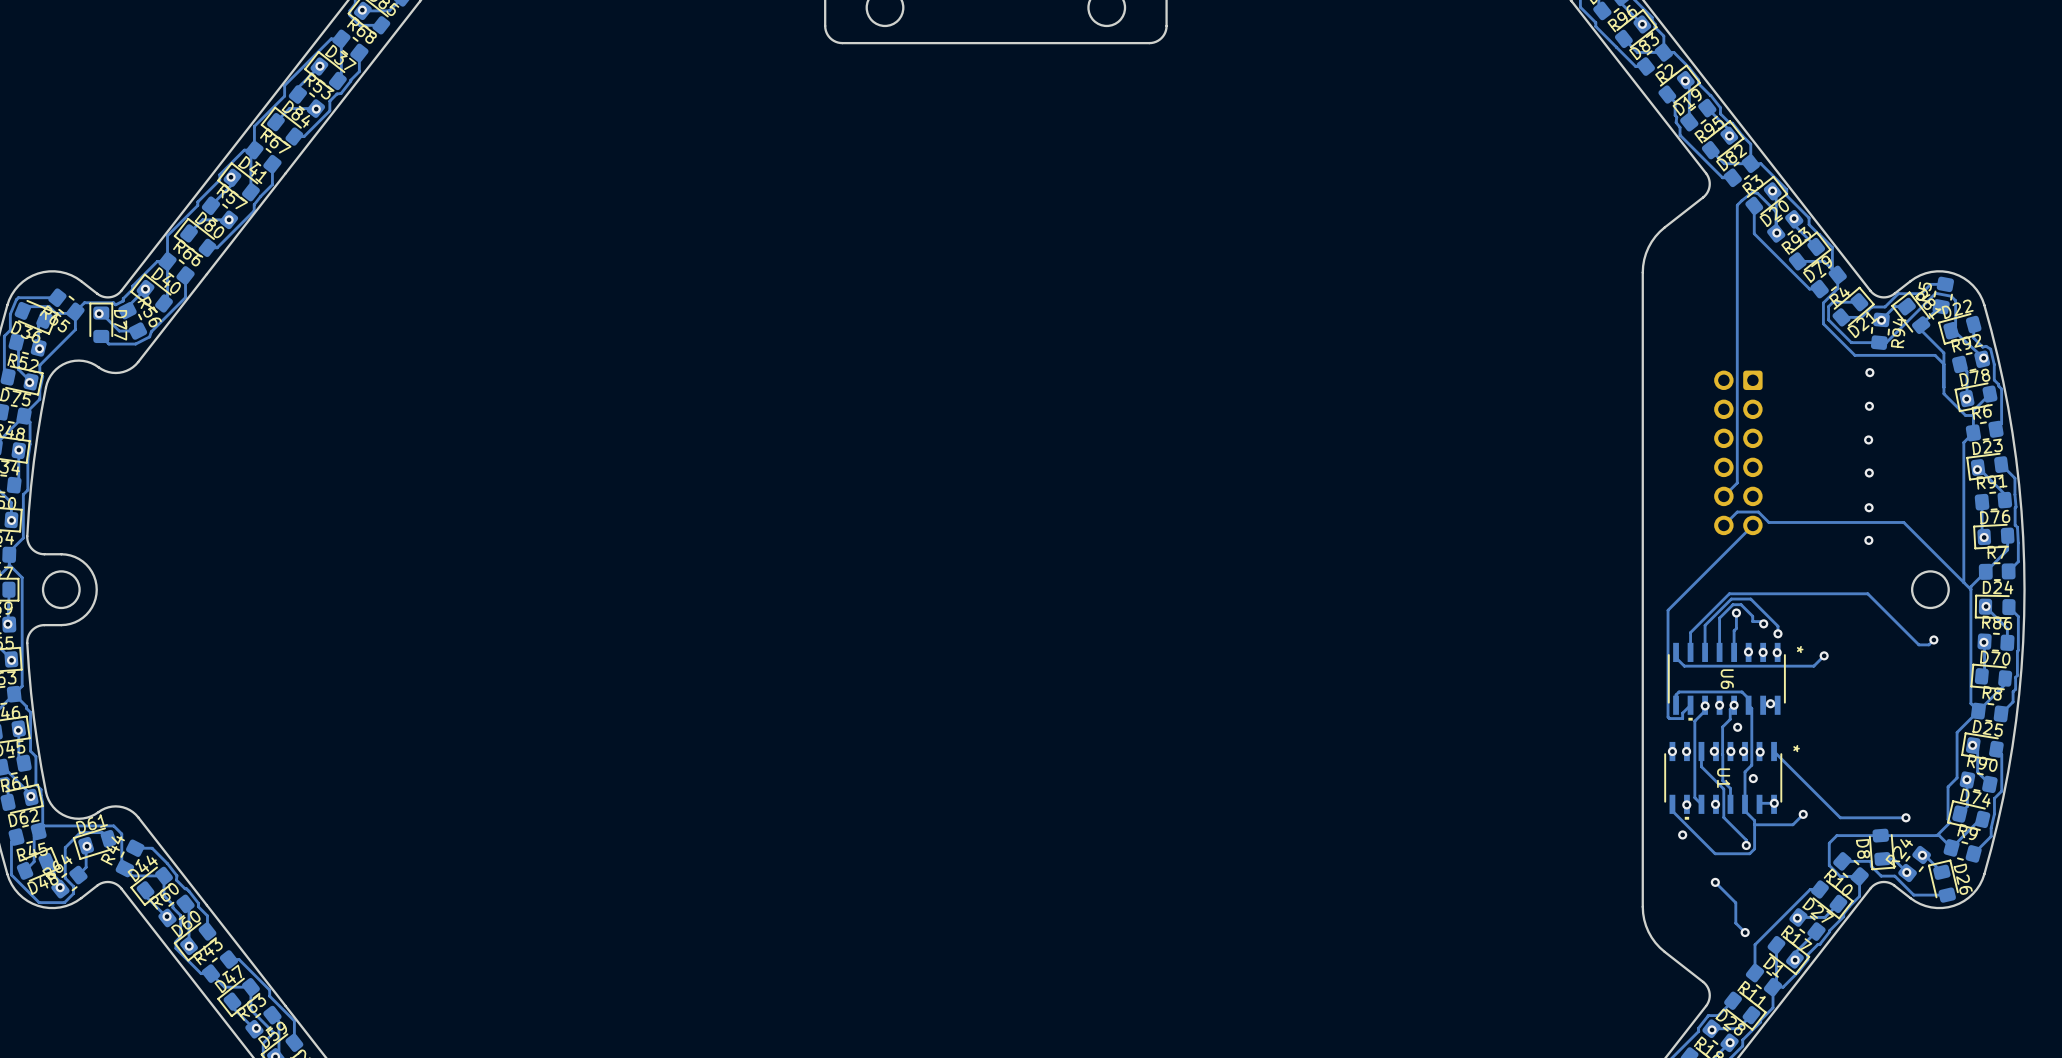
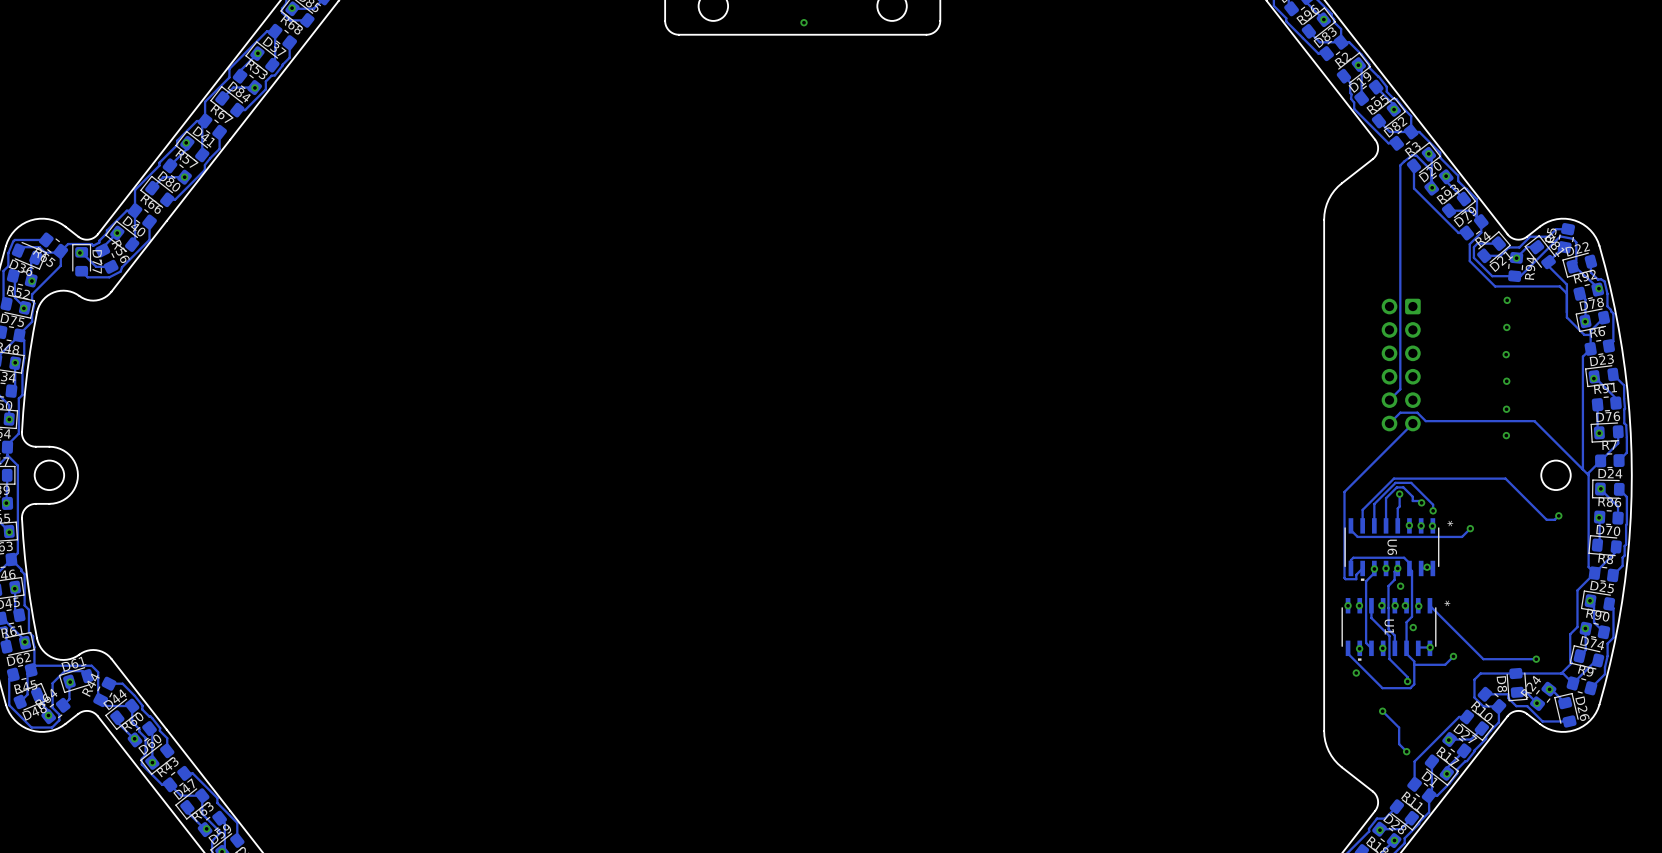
via: none -> (804, 22)

